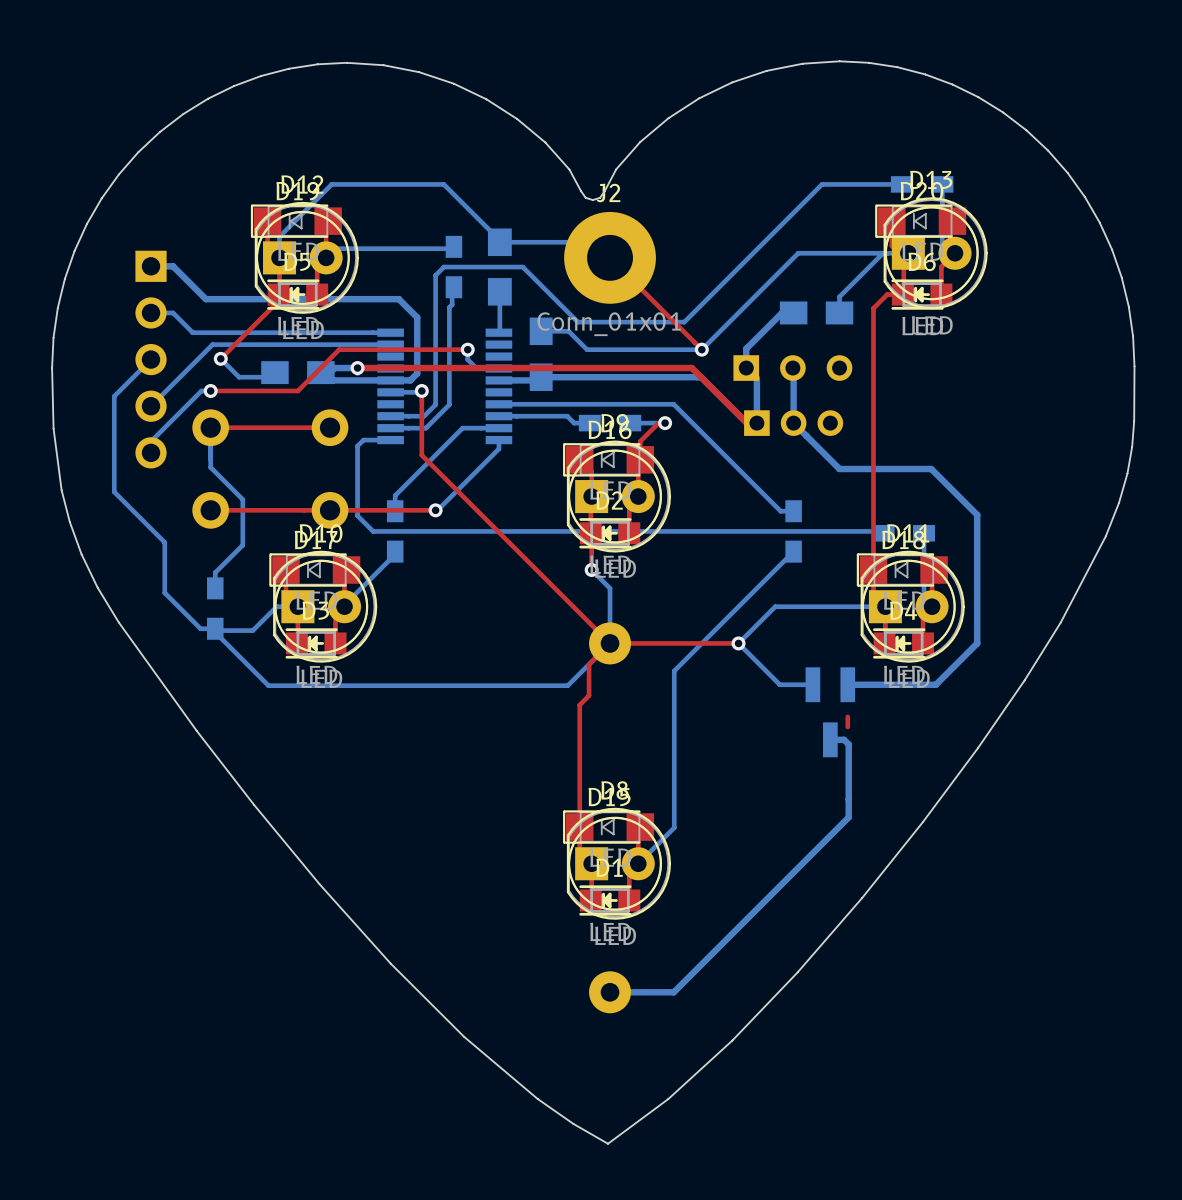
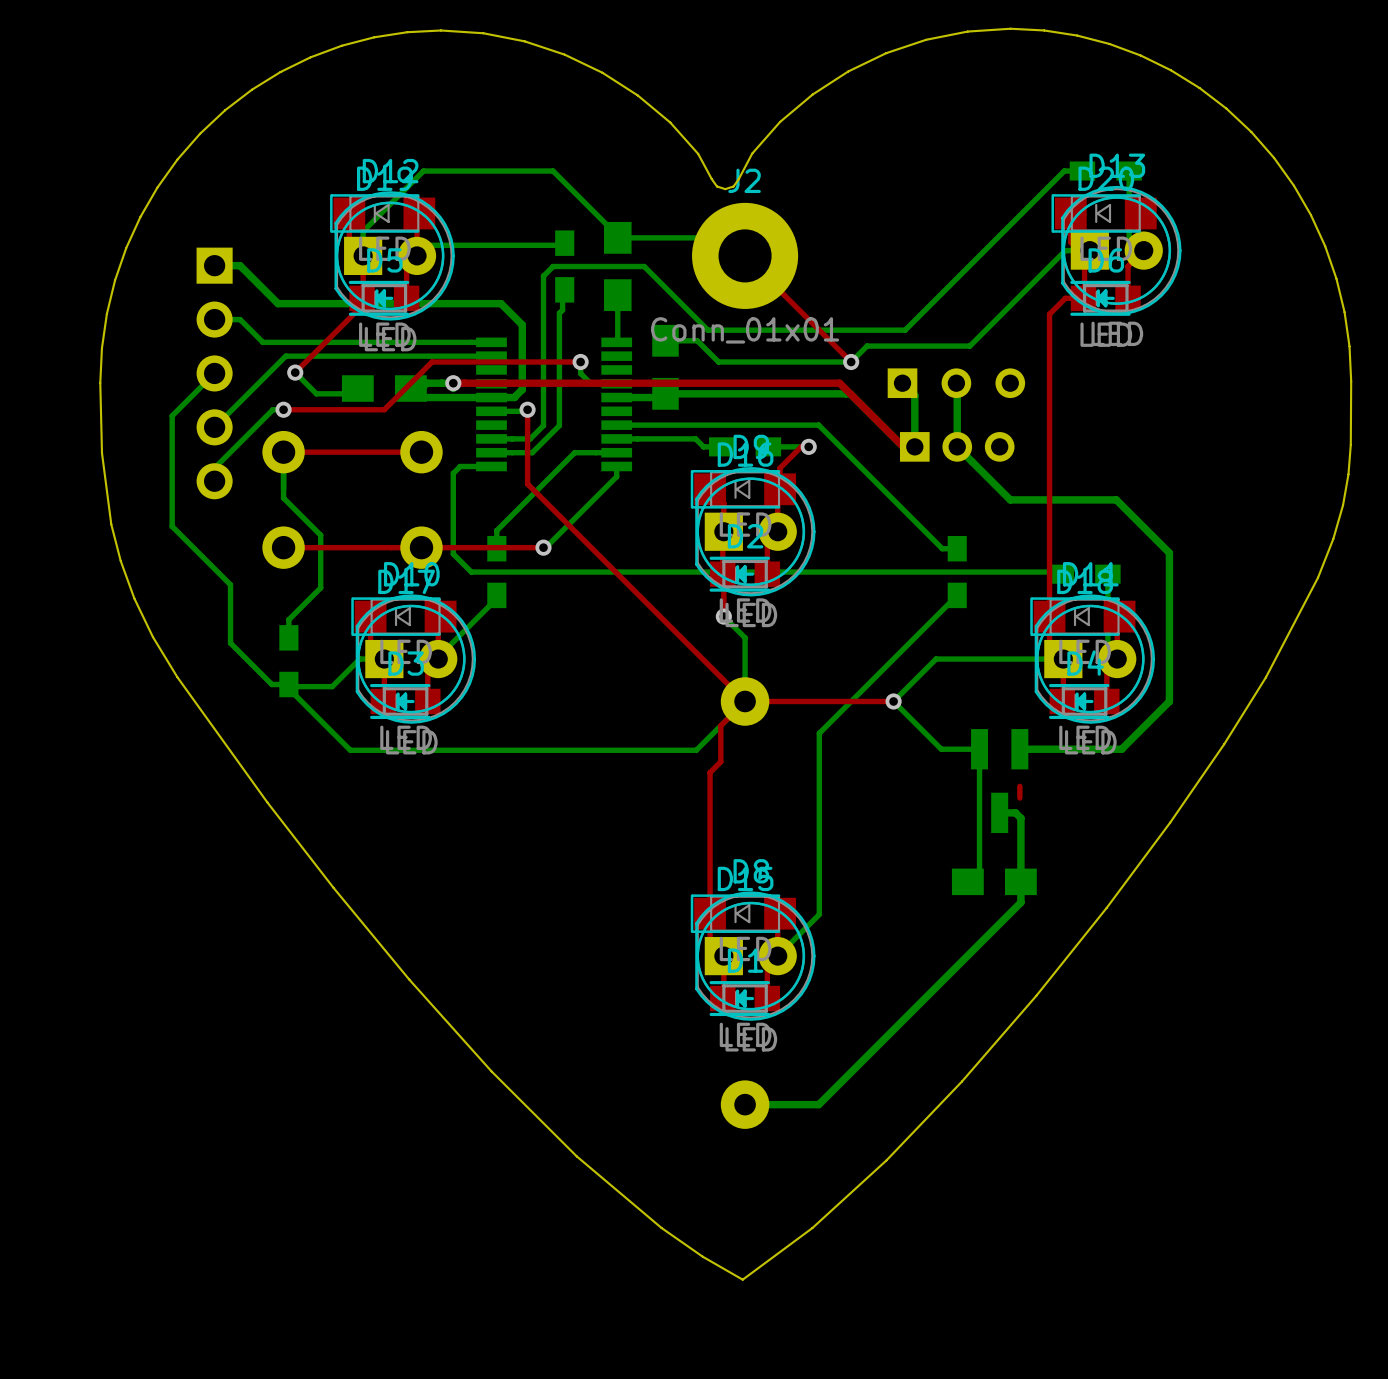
bottom track: (886, 184) (822, 184) (684, 322) -> (1064, 171) (905, 330) (830, 330)
bottom track: (883, 253) (839, 296) (839, 312) -> none
bottom track: (887, 253) (798, 253) (715, 335) -> (1065, 250) (969, 346) (867, 346)
bottom track: (793, 312) (782, 312) (746, 348) (746, 368) -> none
part: (816, 312) -> none
bottom track: none -> (979, 749) (979, 870) (967, 881)
part: none -> (994, 881)

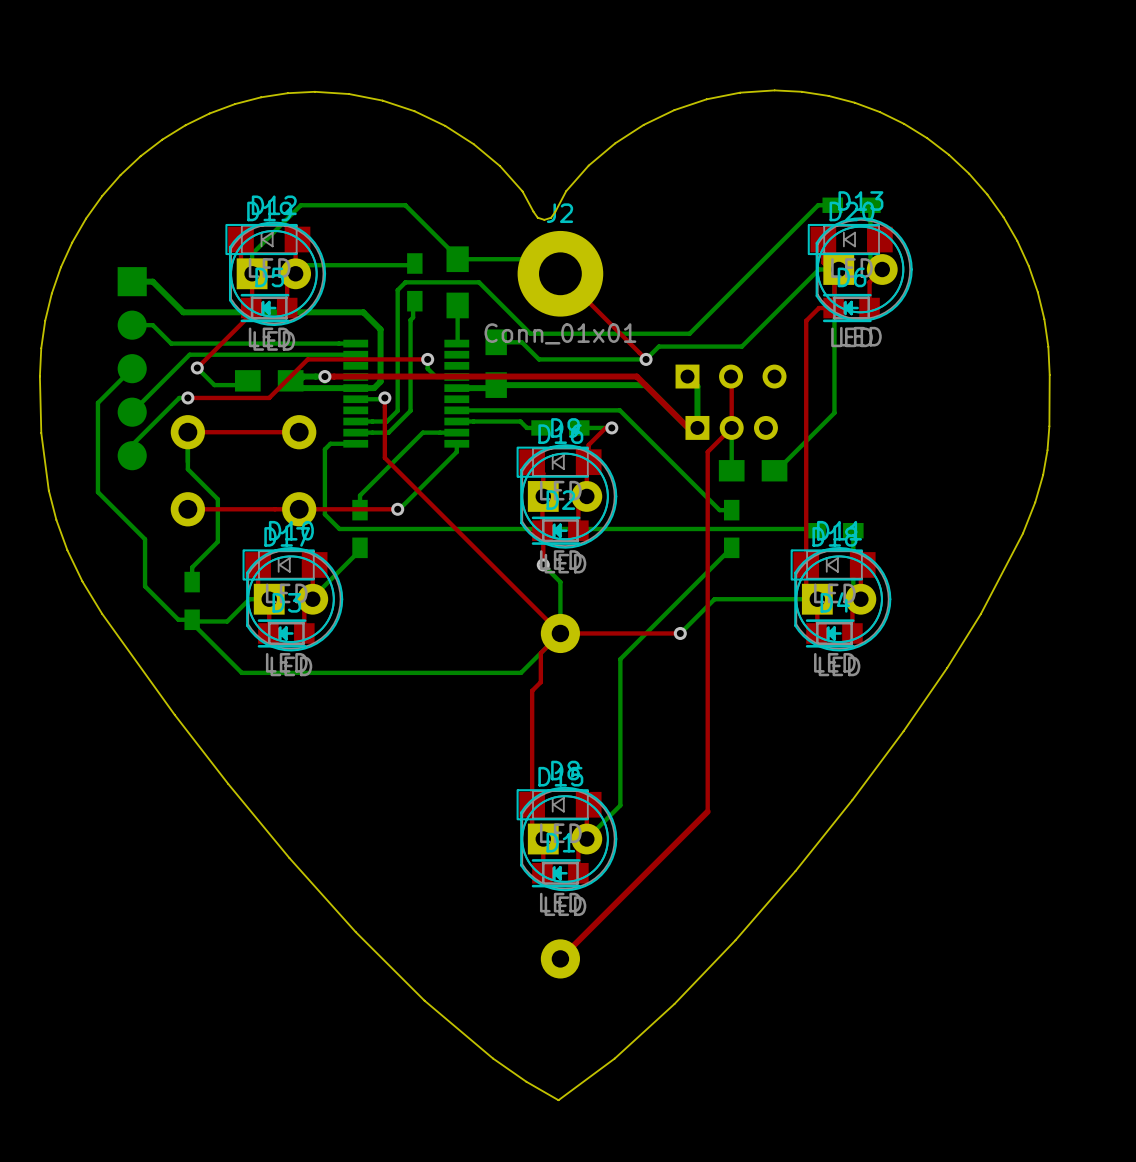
part footprint: [196, 247, 233, 500] -> [117, 267, 147, 471]
bottom track: (956, 383) (957, 446) (1010, 499) -> none
top track: none -> (731, 377) (731, 427) (707, 451) (707, 811) (560, 958)
bottom track: none -> (731, 427) (731, 470)
bottom track: (1012, 499) (1116, 499) (1169, 552) (1169, 701) (1121, 749) (1019, 749) -> (776, 470) (834, 412) (834, 273)
bottom track: (893, 701) (941, 749) (979, 749) (979, 870) (967, 881) -> none
part: (999, 781) -> none
top track: (1019, 786) (1019, 798) -> none
bottom track: (999, 812) (1015, 812) (1020, 818) (1020, 902) (818, 1104) (745, 1104) -> none
part position: (994, 881) -> (753, 470)

